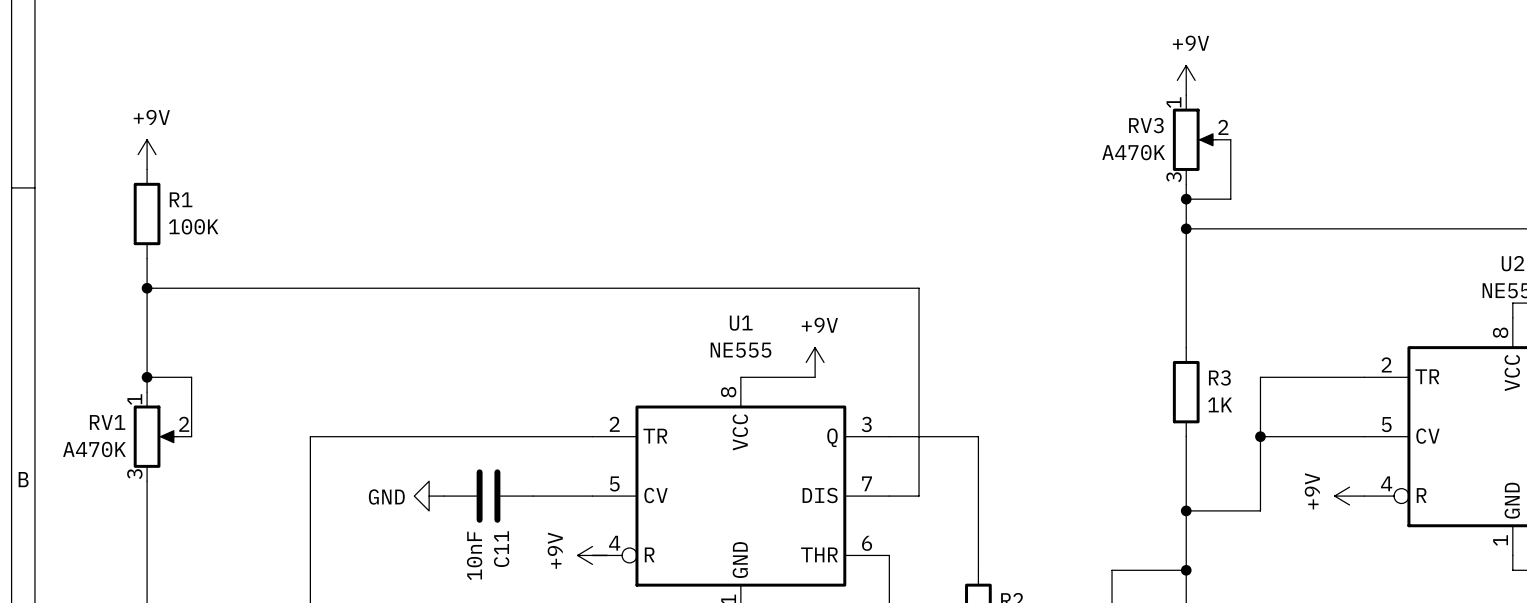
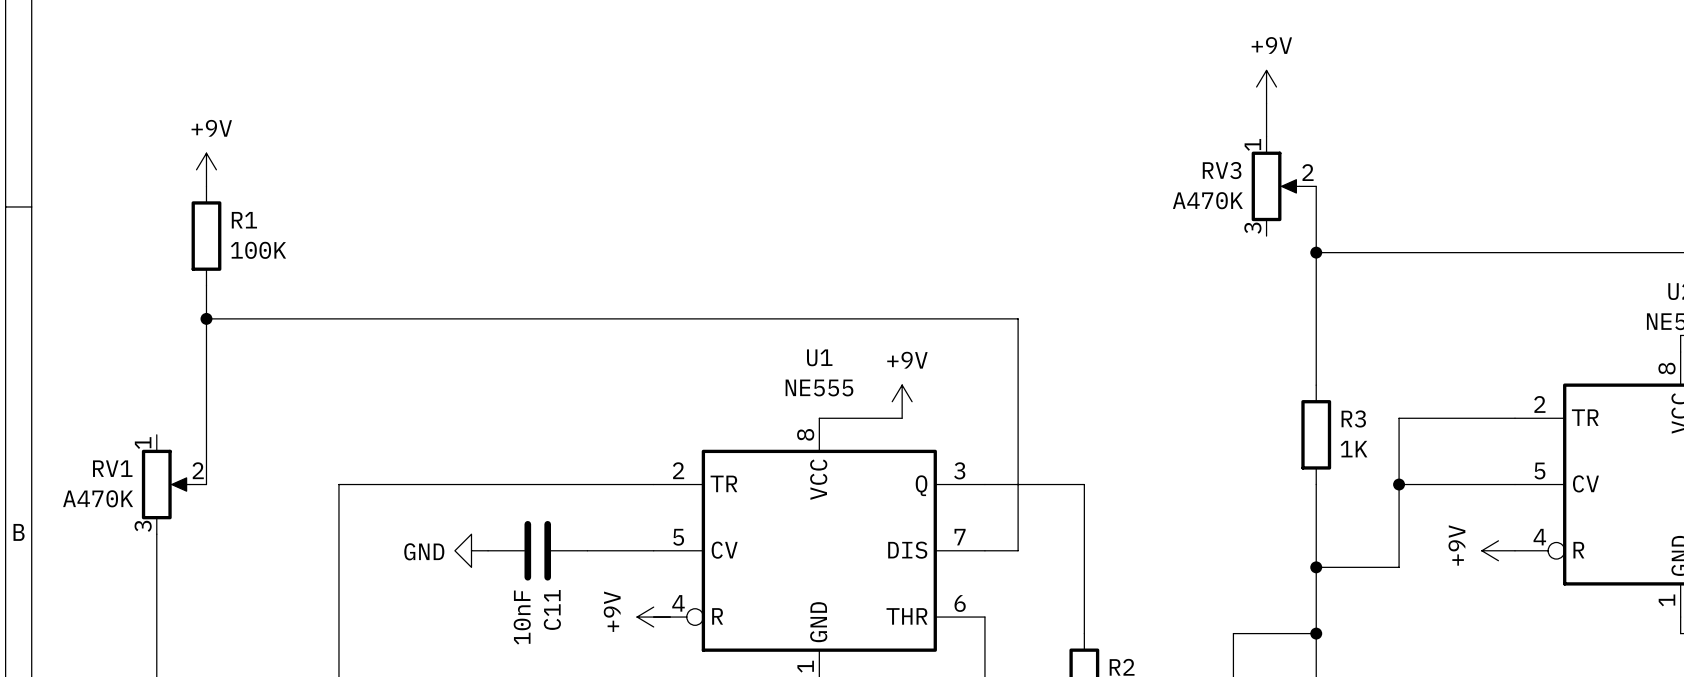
power symbol position: +9V (1186, 80) -> +9V (1266, 87)
wire: none -> (1266, 103) (1266, 136)
RV3 position: (1201, 139) -> (1283, 186)
wire: (1230, 139) (1230, 199) (1186, 199) -> none
power symbol position: +9V (147, 154) -> +9V (206, 169)
junction: (1186, 199) -> none
R1 position: (147, 214) -> (206, 236)
wire: (147, 258) (147, 392) -> none
wire: (147, 288) (191, 288) -> none
junction position: (147, 288) -> (206, 318)
wire: (147, 377) (191, 377) -> (206, 285) (206, 418)
junction: (147, 377) -> none

